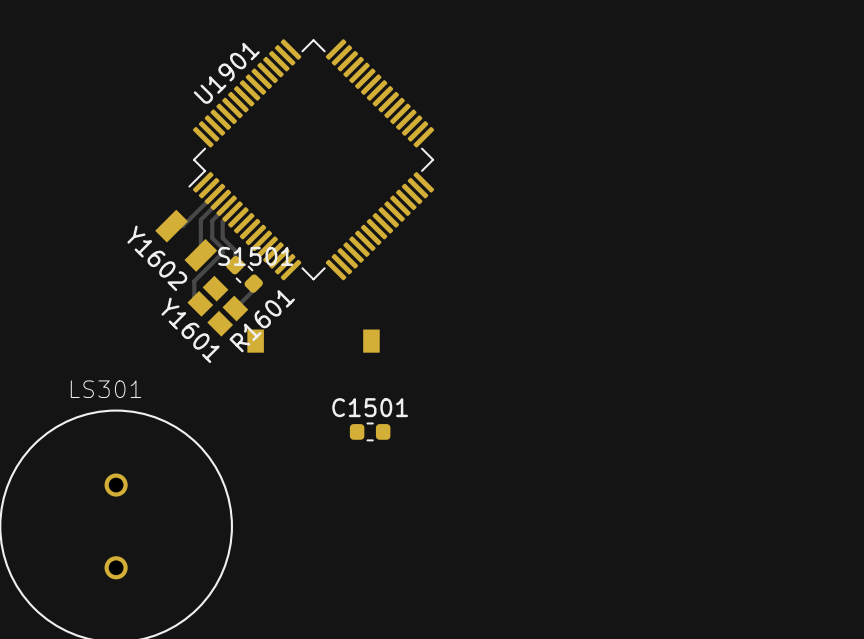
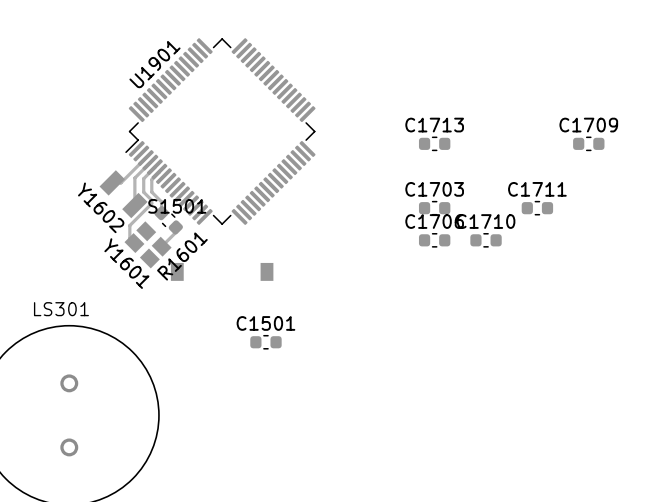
C1713: none -> (434, 143)
C1709: none -> (588, 143)
C1703: none -> (434, 208)
C1711: none -> (537, 208)
C1706: none -> (434, 240)
C1710: none -> (486, 240)

